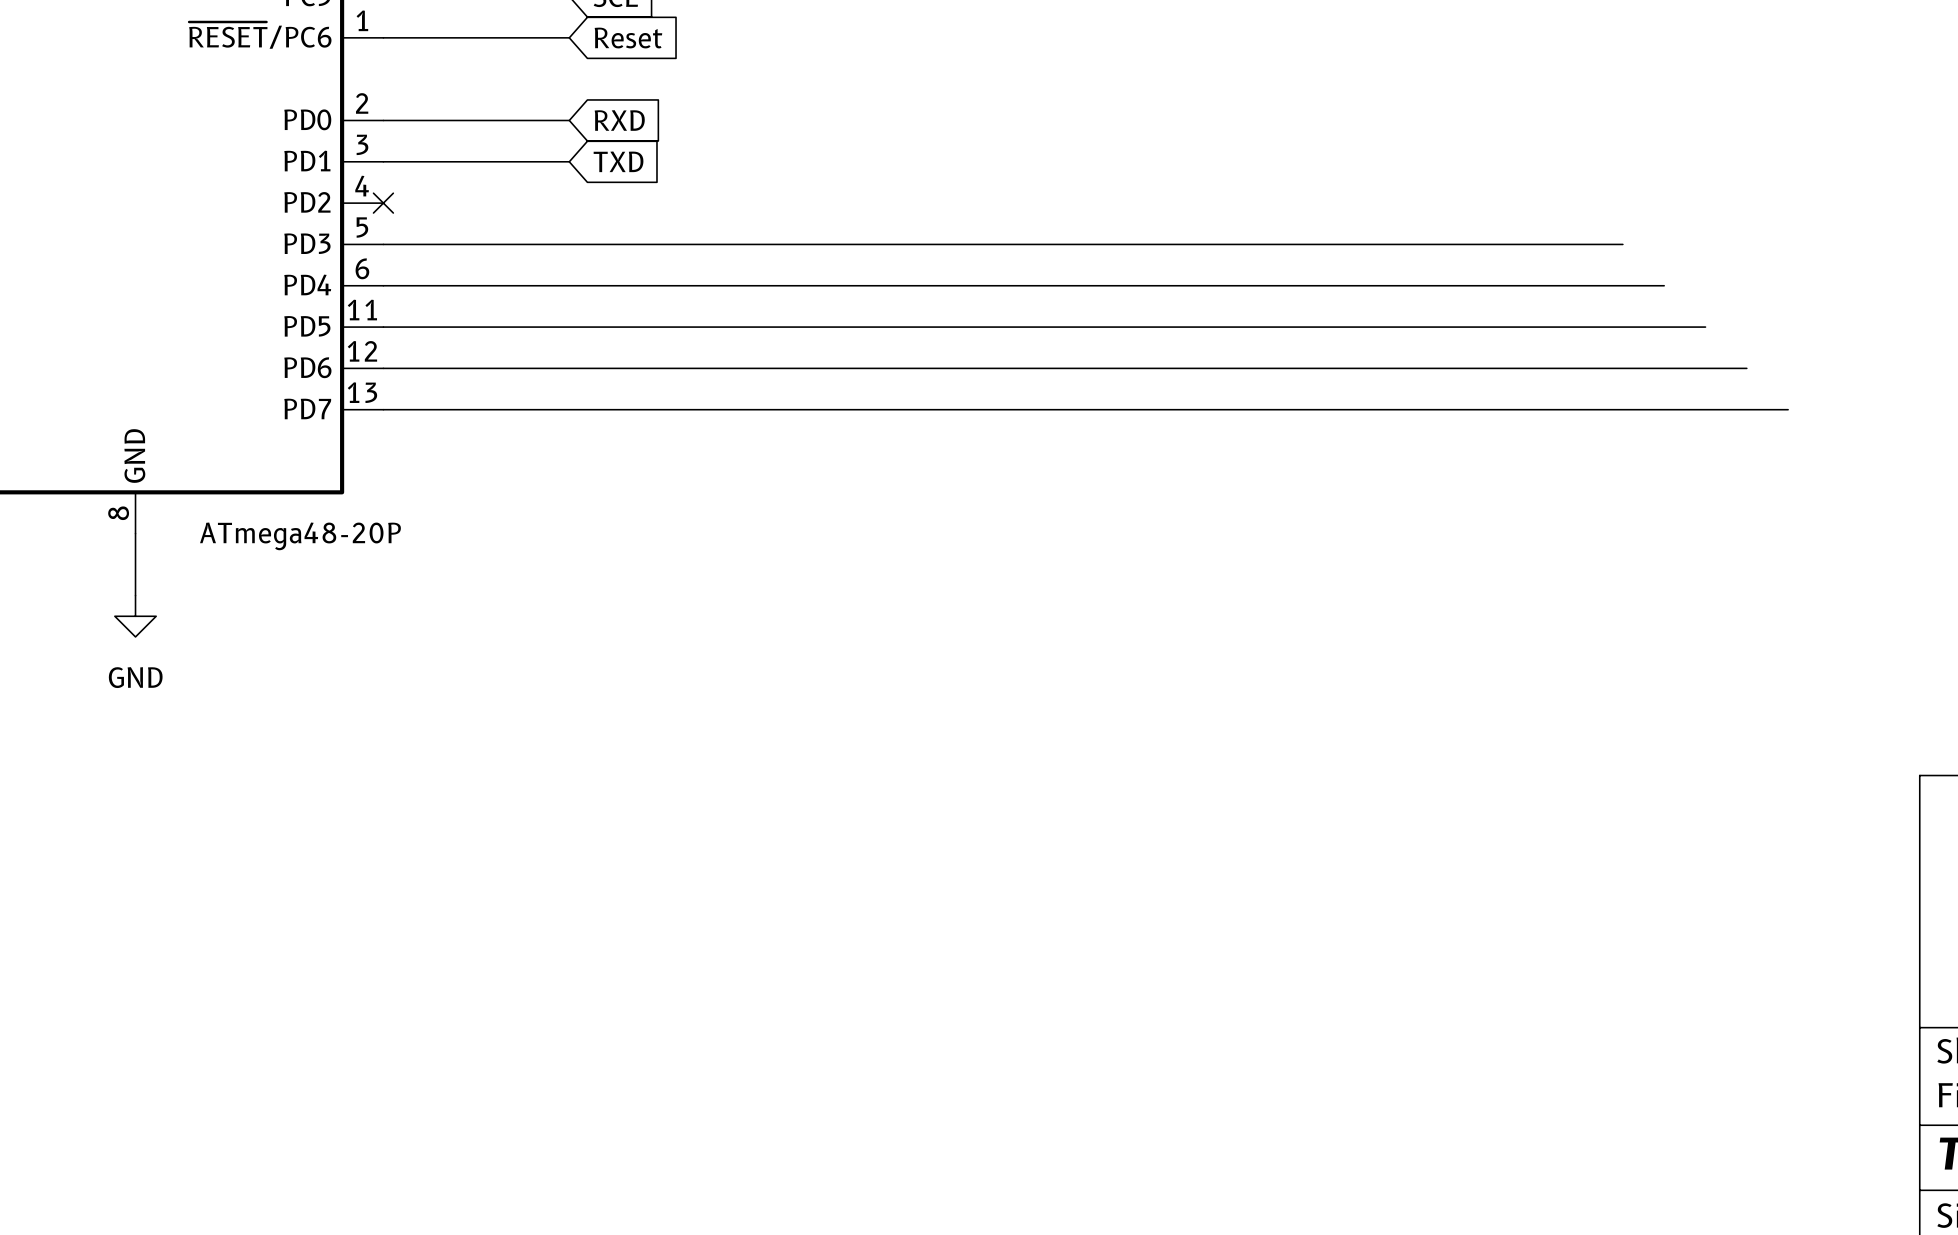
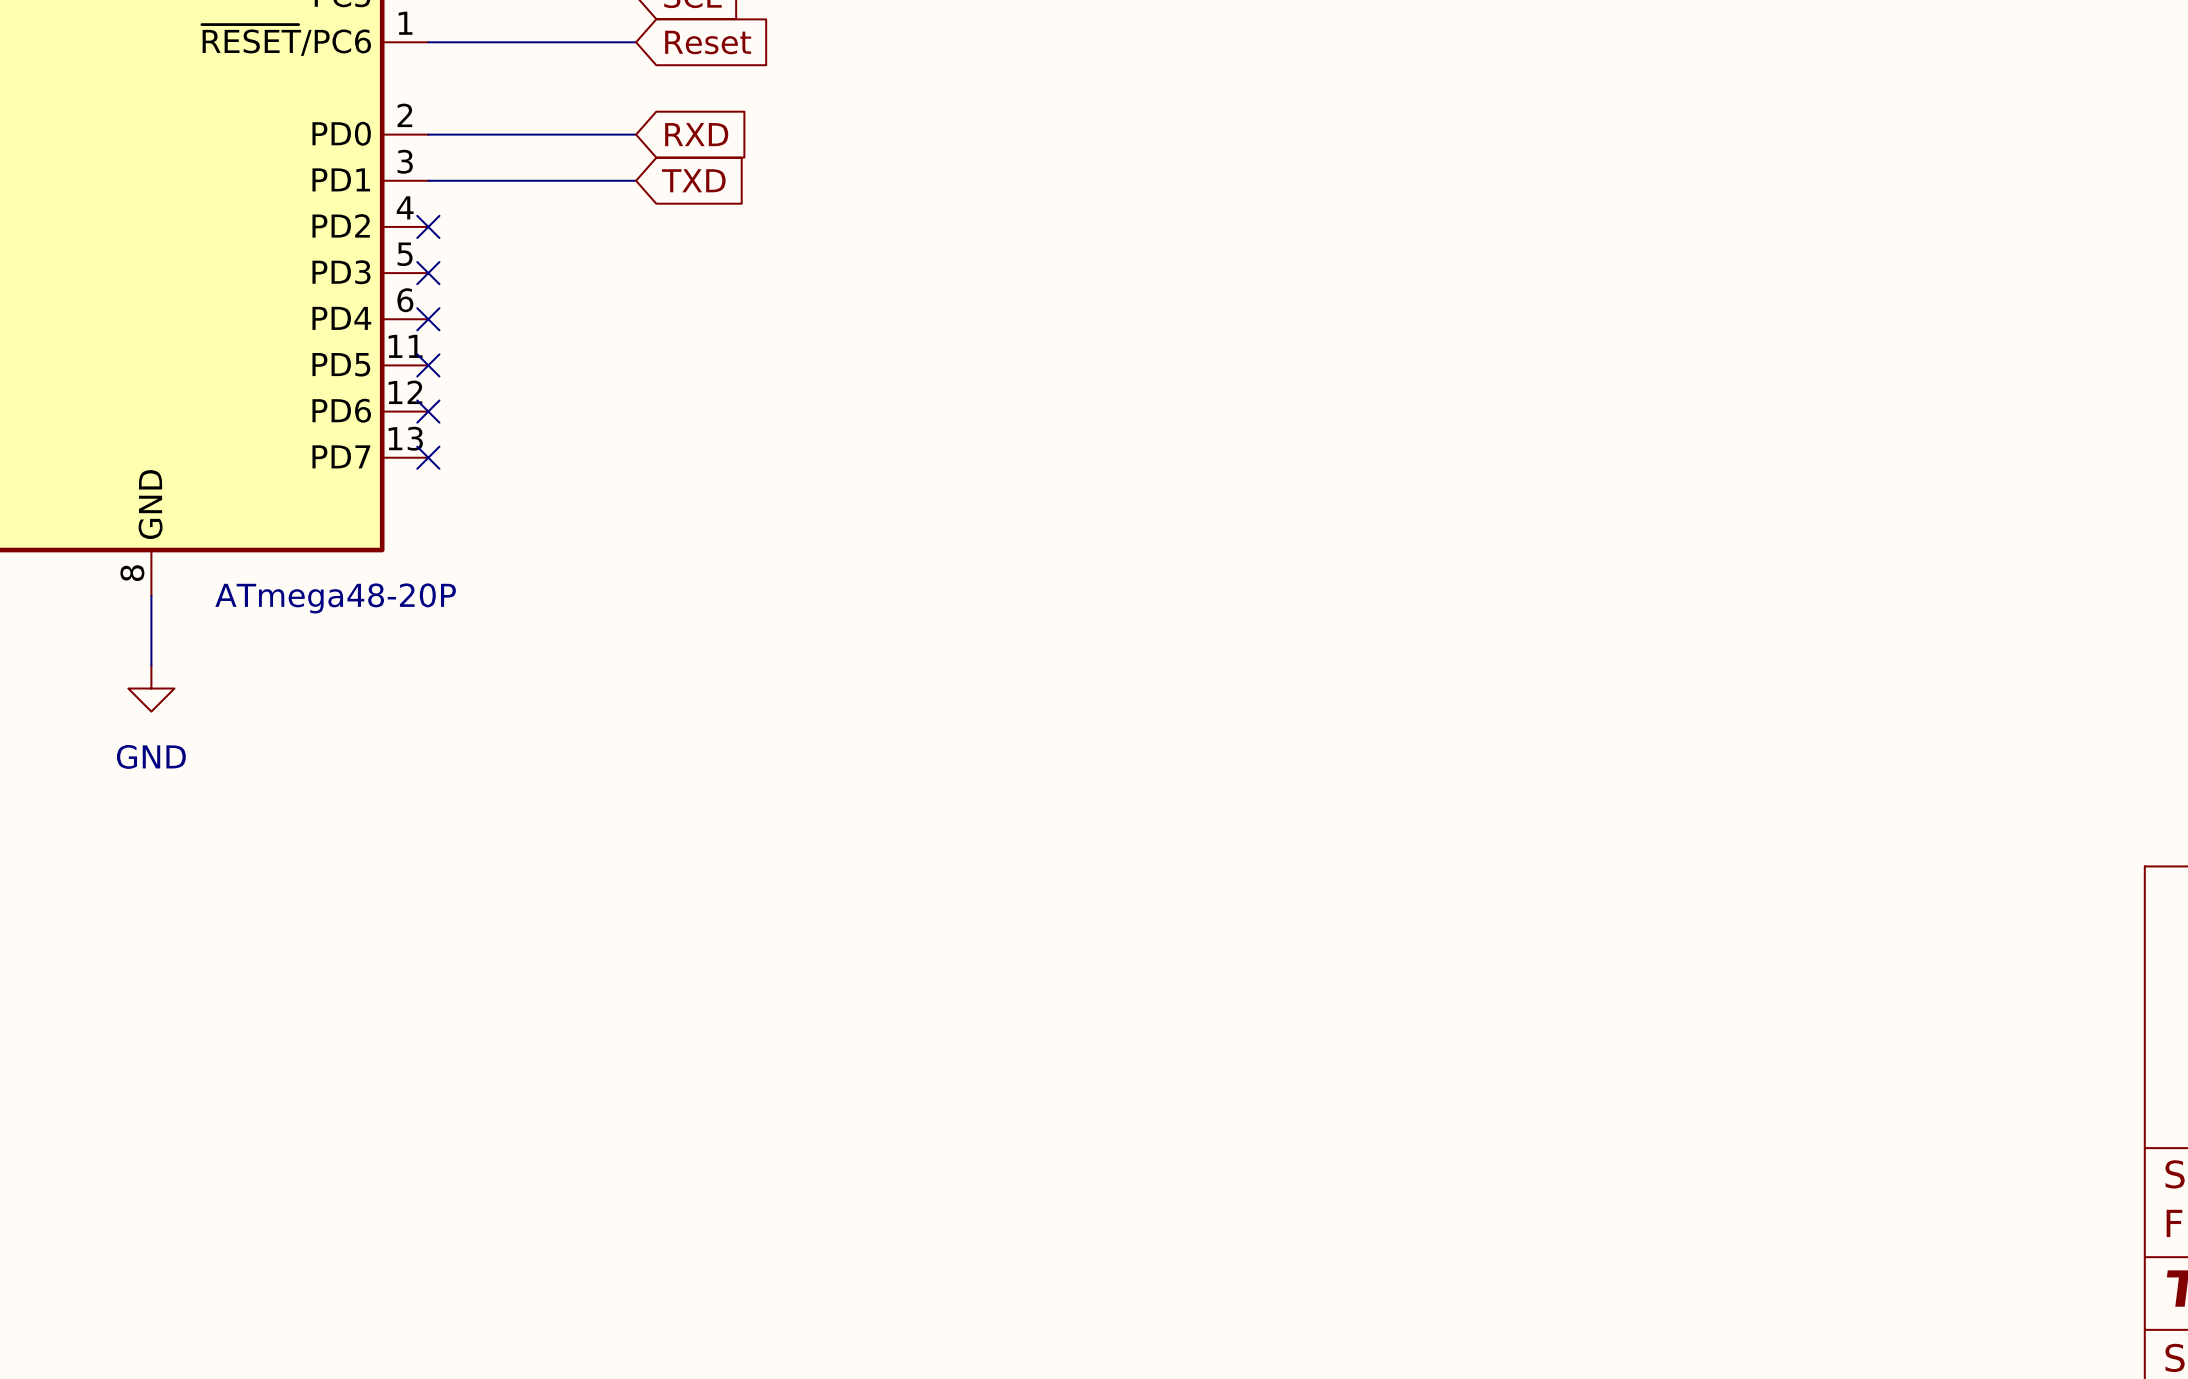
wire: (383, 244) (1622, 244) -> none
no-connect mark: none -> (428, 273)
wire: (383, 285) (1664, 285) -> none
no-connect mark: none -> (428, 319)
wire: (383, 327) (1705, 327) -> none
no-connect mark: none -> (428, 365)
wire: (383, 368) (1746, 368) -> none
no-connect mark: none -> (428, 411)
wire: (383, 409) (1788, 409) -> none
no-connect mark: none -> (428, 457)

